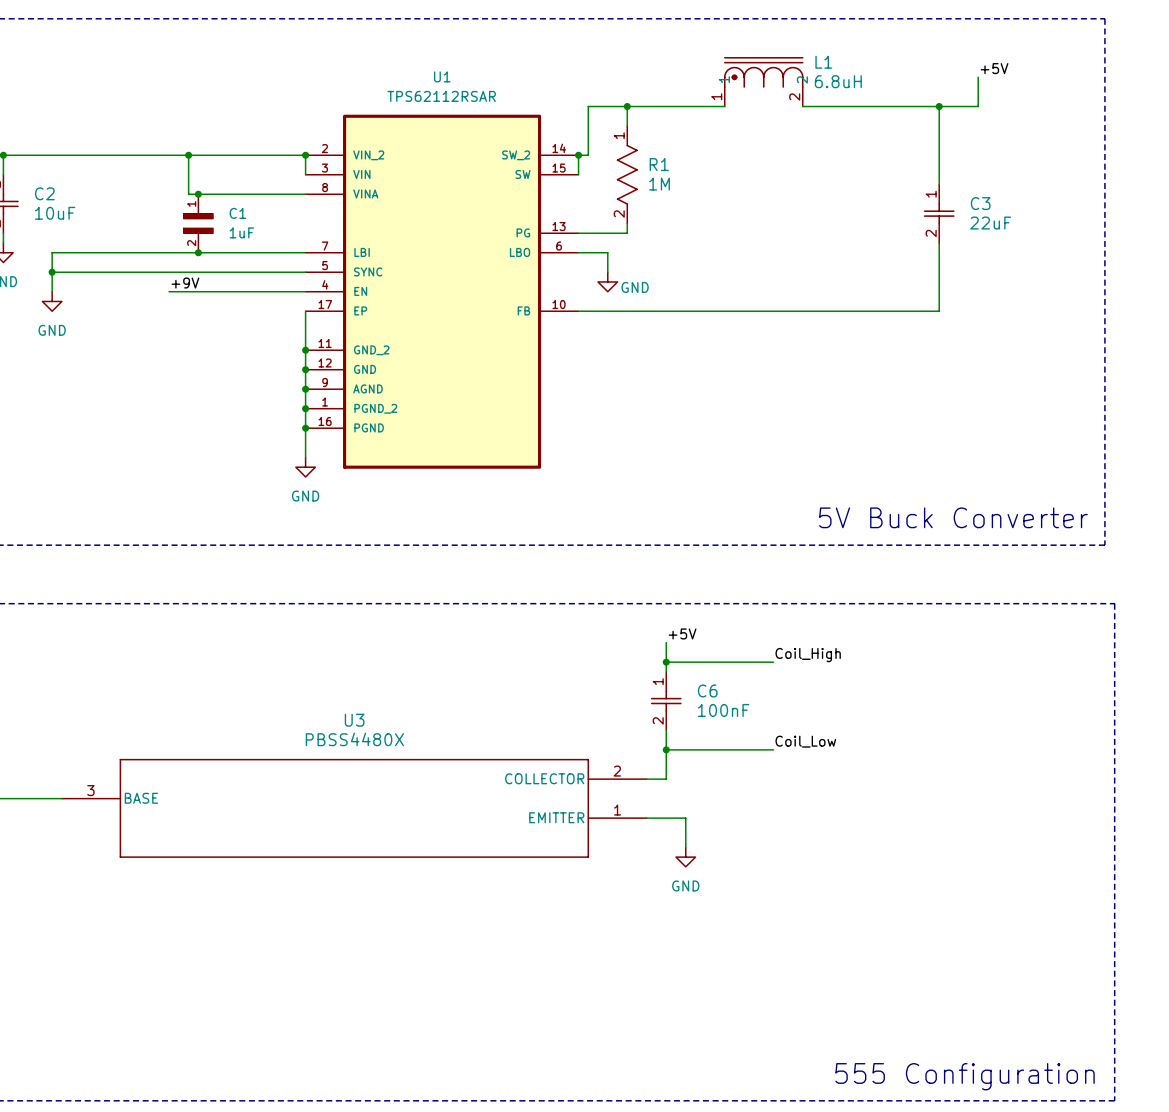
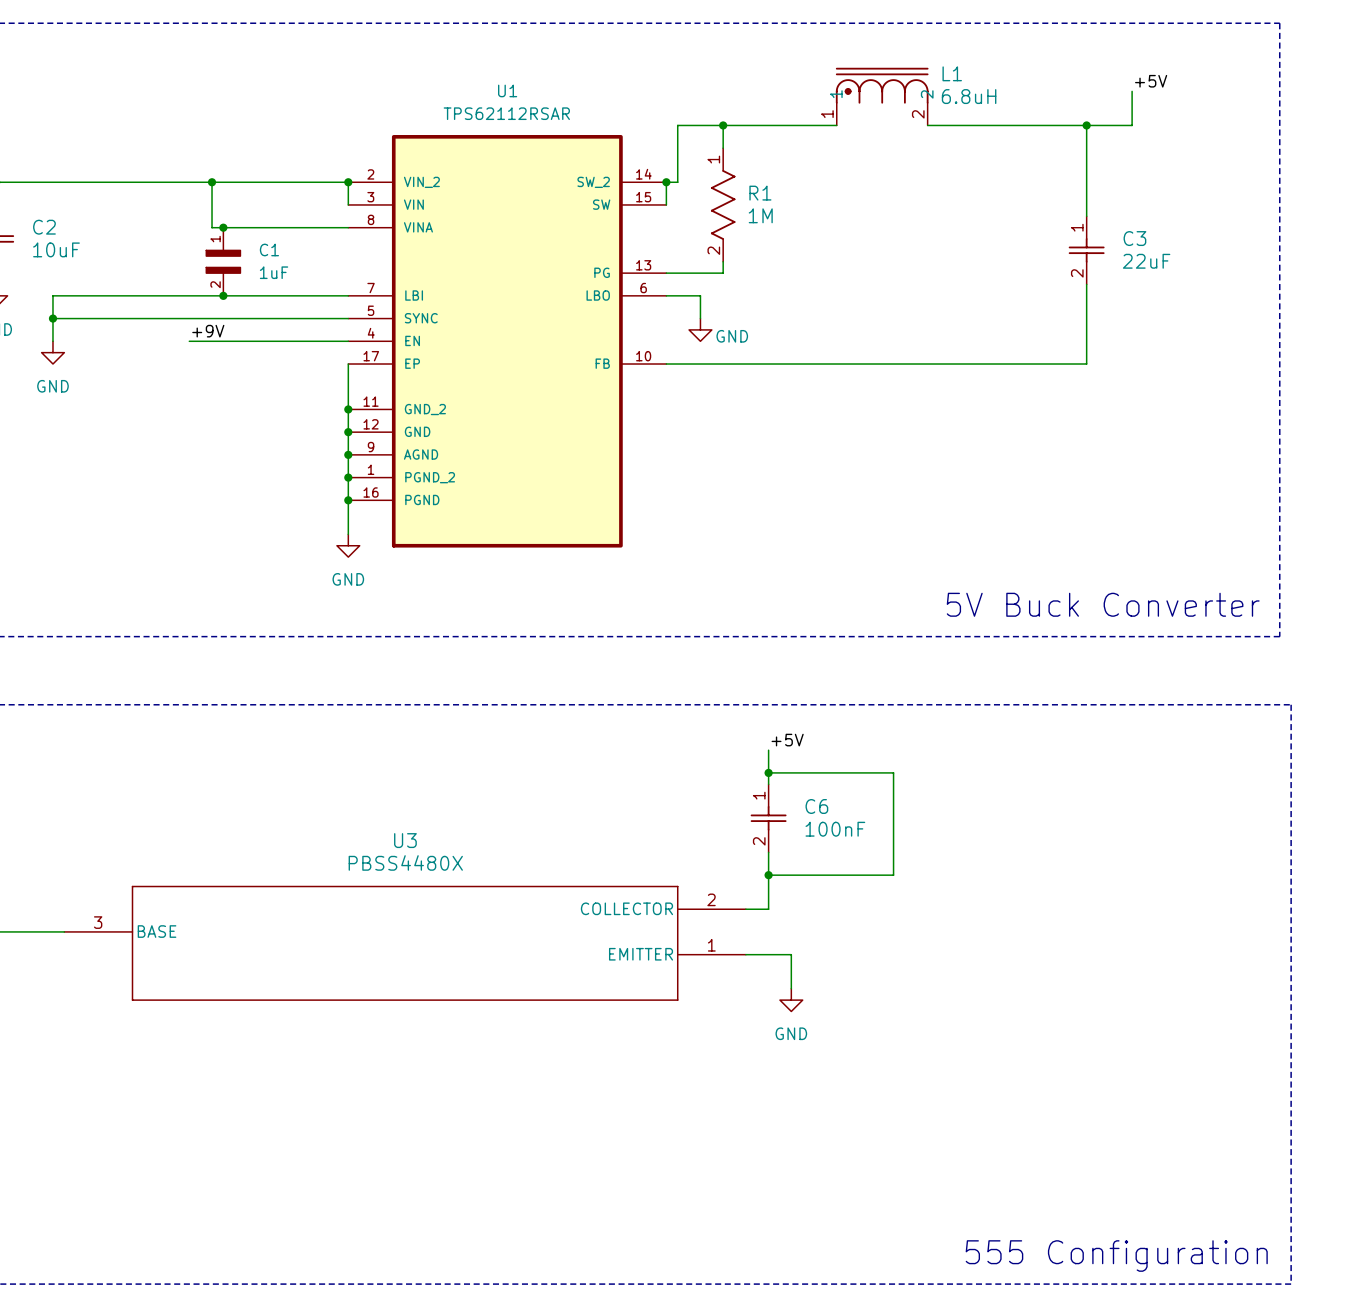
label: Coil_High (808, 655) -> none
wire: none -> (893, 772) (893, 875)
label: Coil_Low (805, 741) -> none

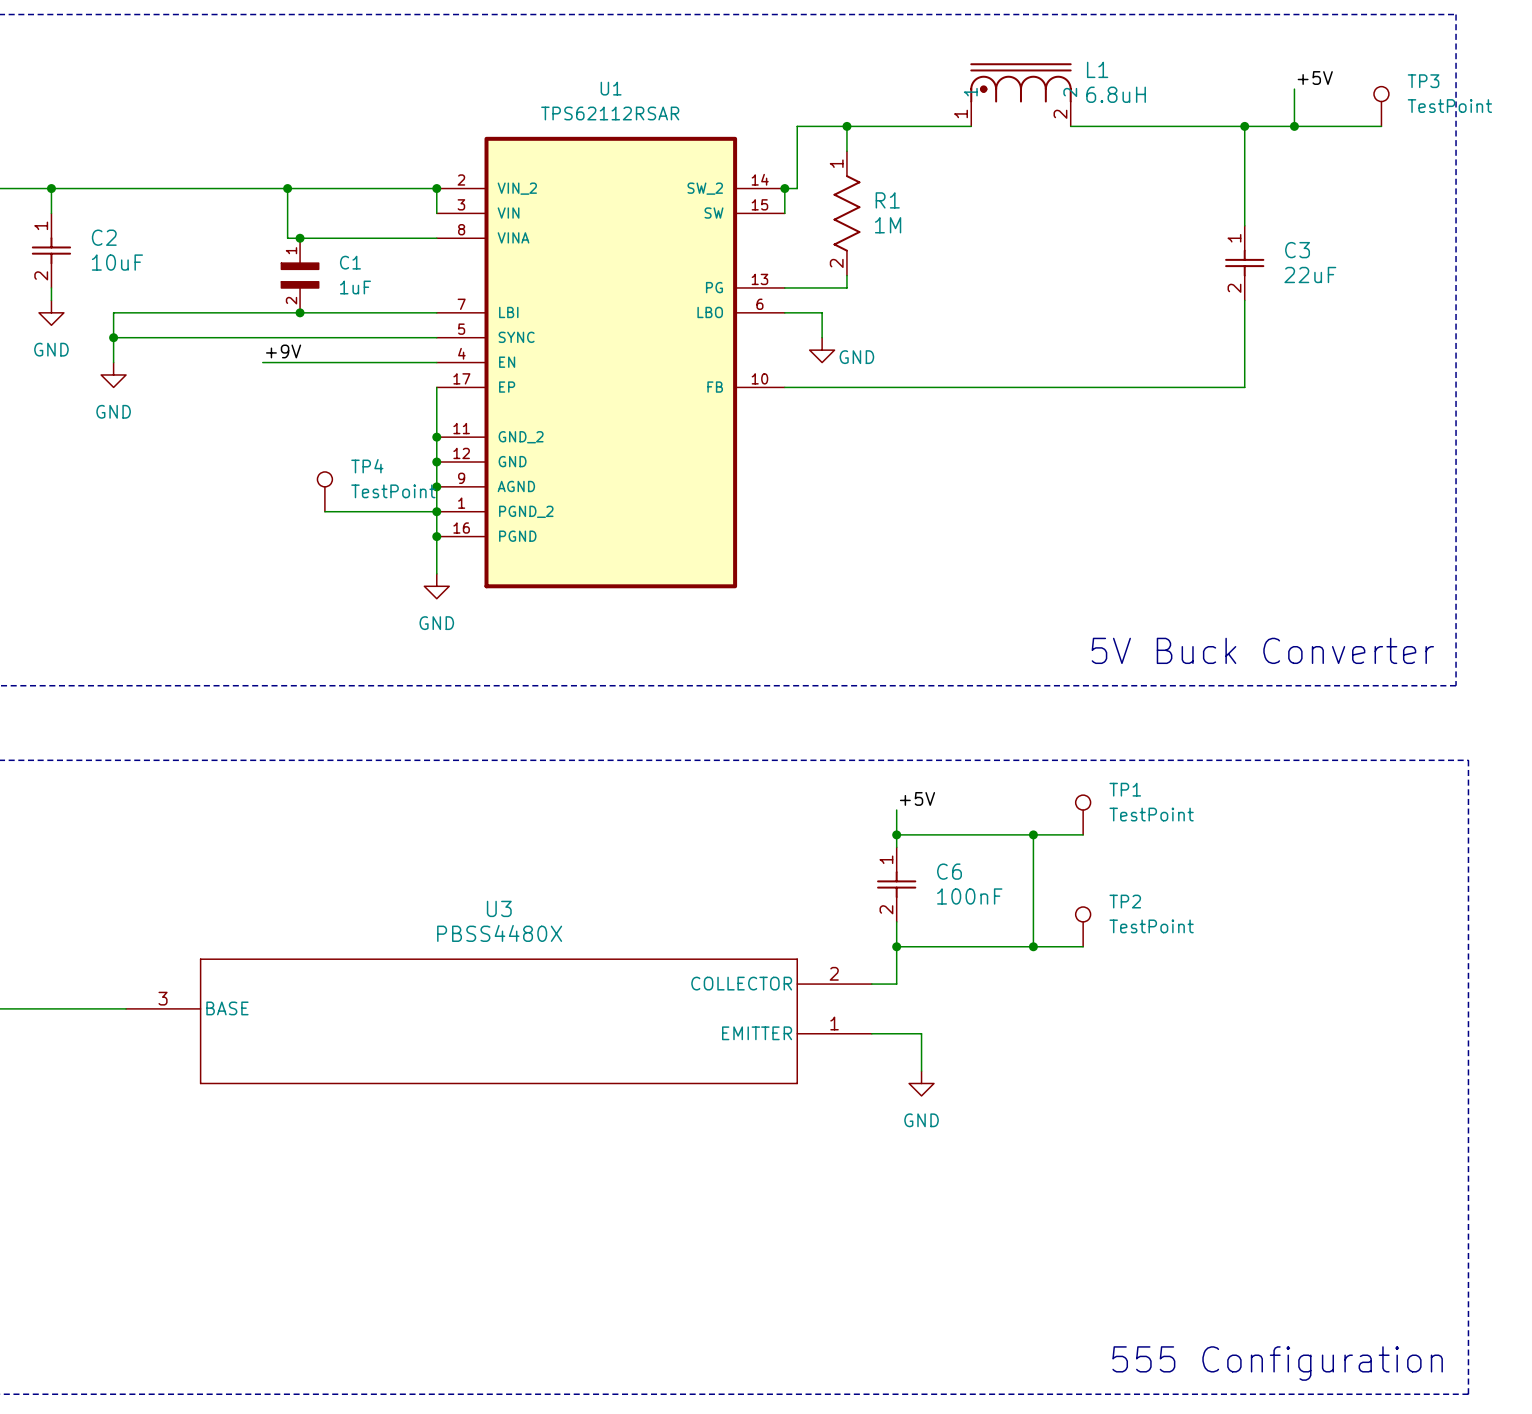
TP3: none -> TestPoint (1381, 106)
wire: none -> (1294, 126) (1381, 126)
junction: none -> (1294, 126)
TP4: none -> TestPoint (324, 491)
wire: none -> (324, 511) (436, 511)
TP1: none -> TestPoint (1083, 815)
wire: none -> (1033, 834) (1083, 834)
junction: none -> (1033, 834)
TP2: none -> TestPoint (1083, 926)
wire: none -> (1033, 946) (1083, 946)
junction: none -> (1033, 946)

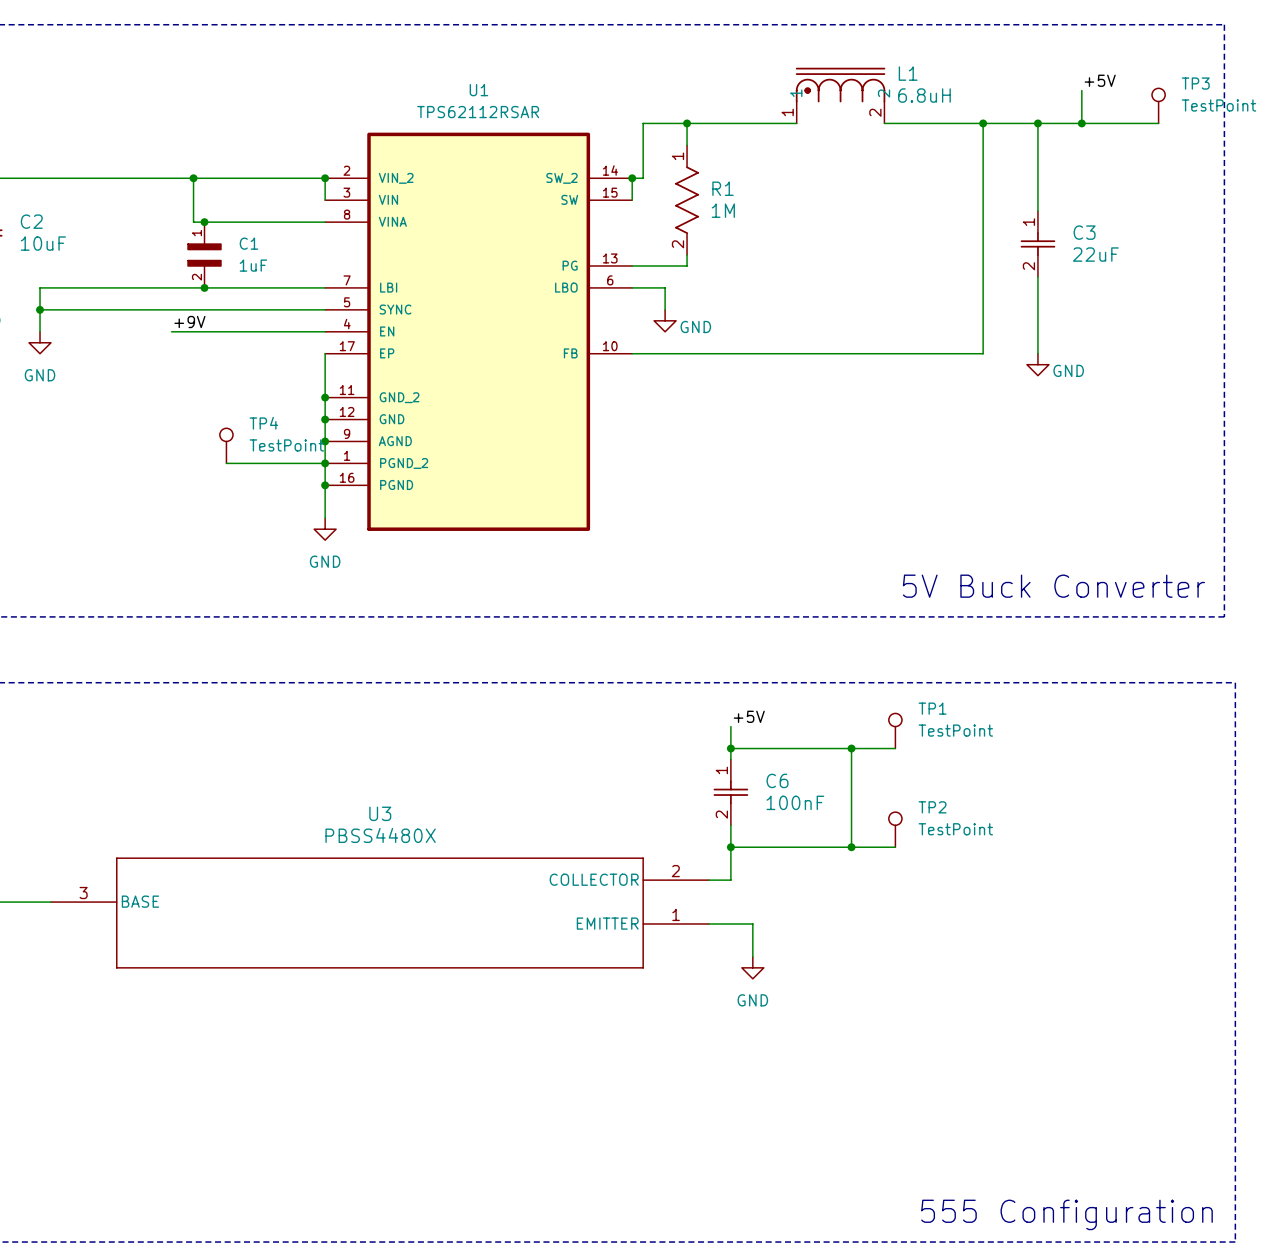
junction: none -> (983, 123)
wire: (1182, 387) (1244, 387) -> (983, 353) (983, 123)
power symbol: none -> GND (1037, 364)

